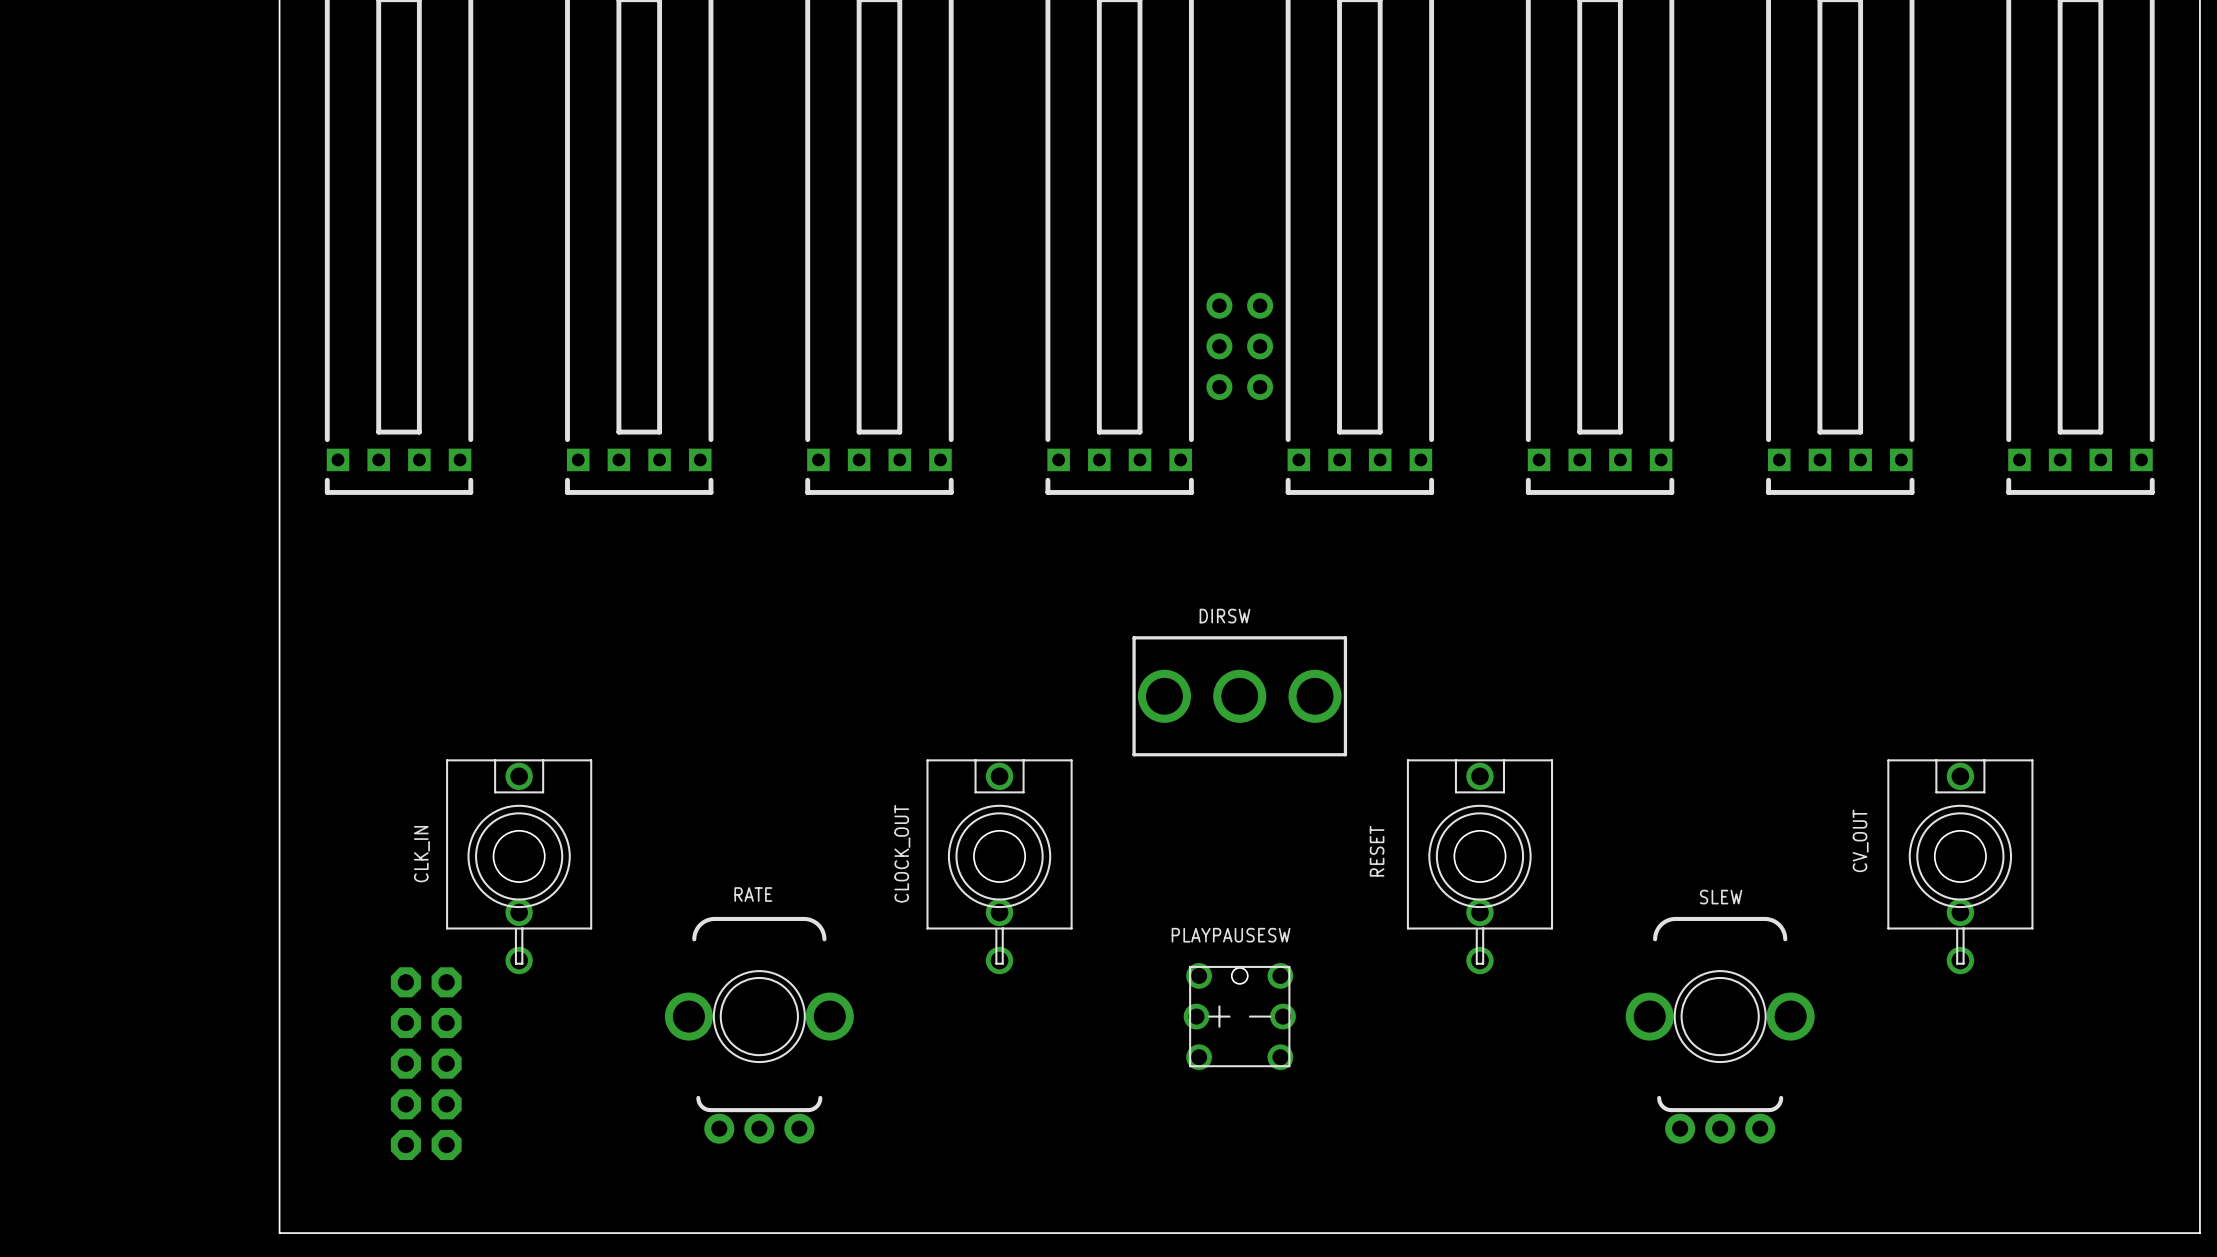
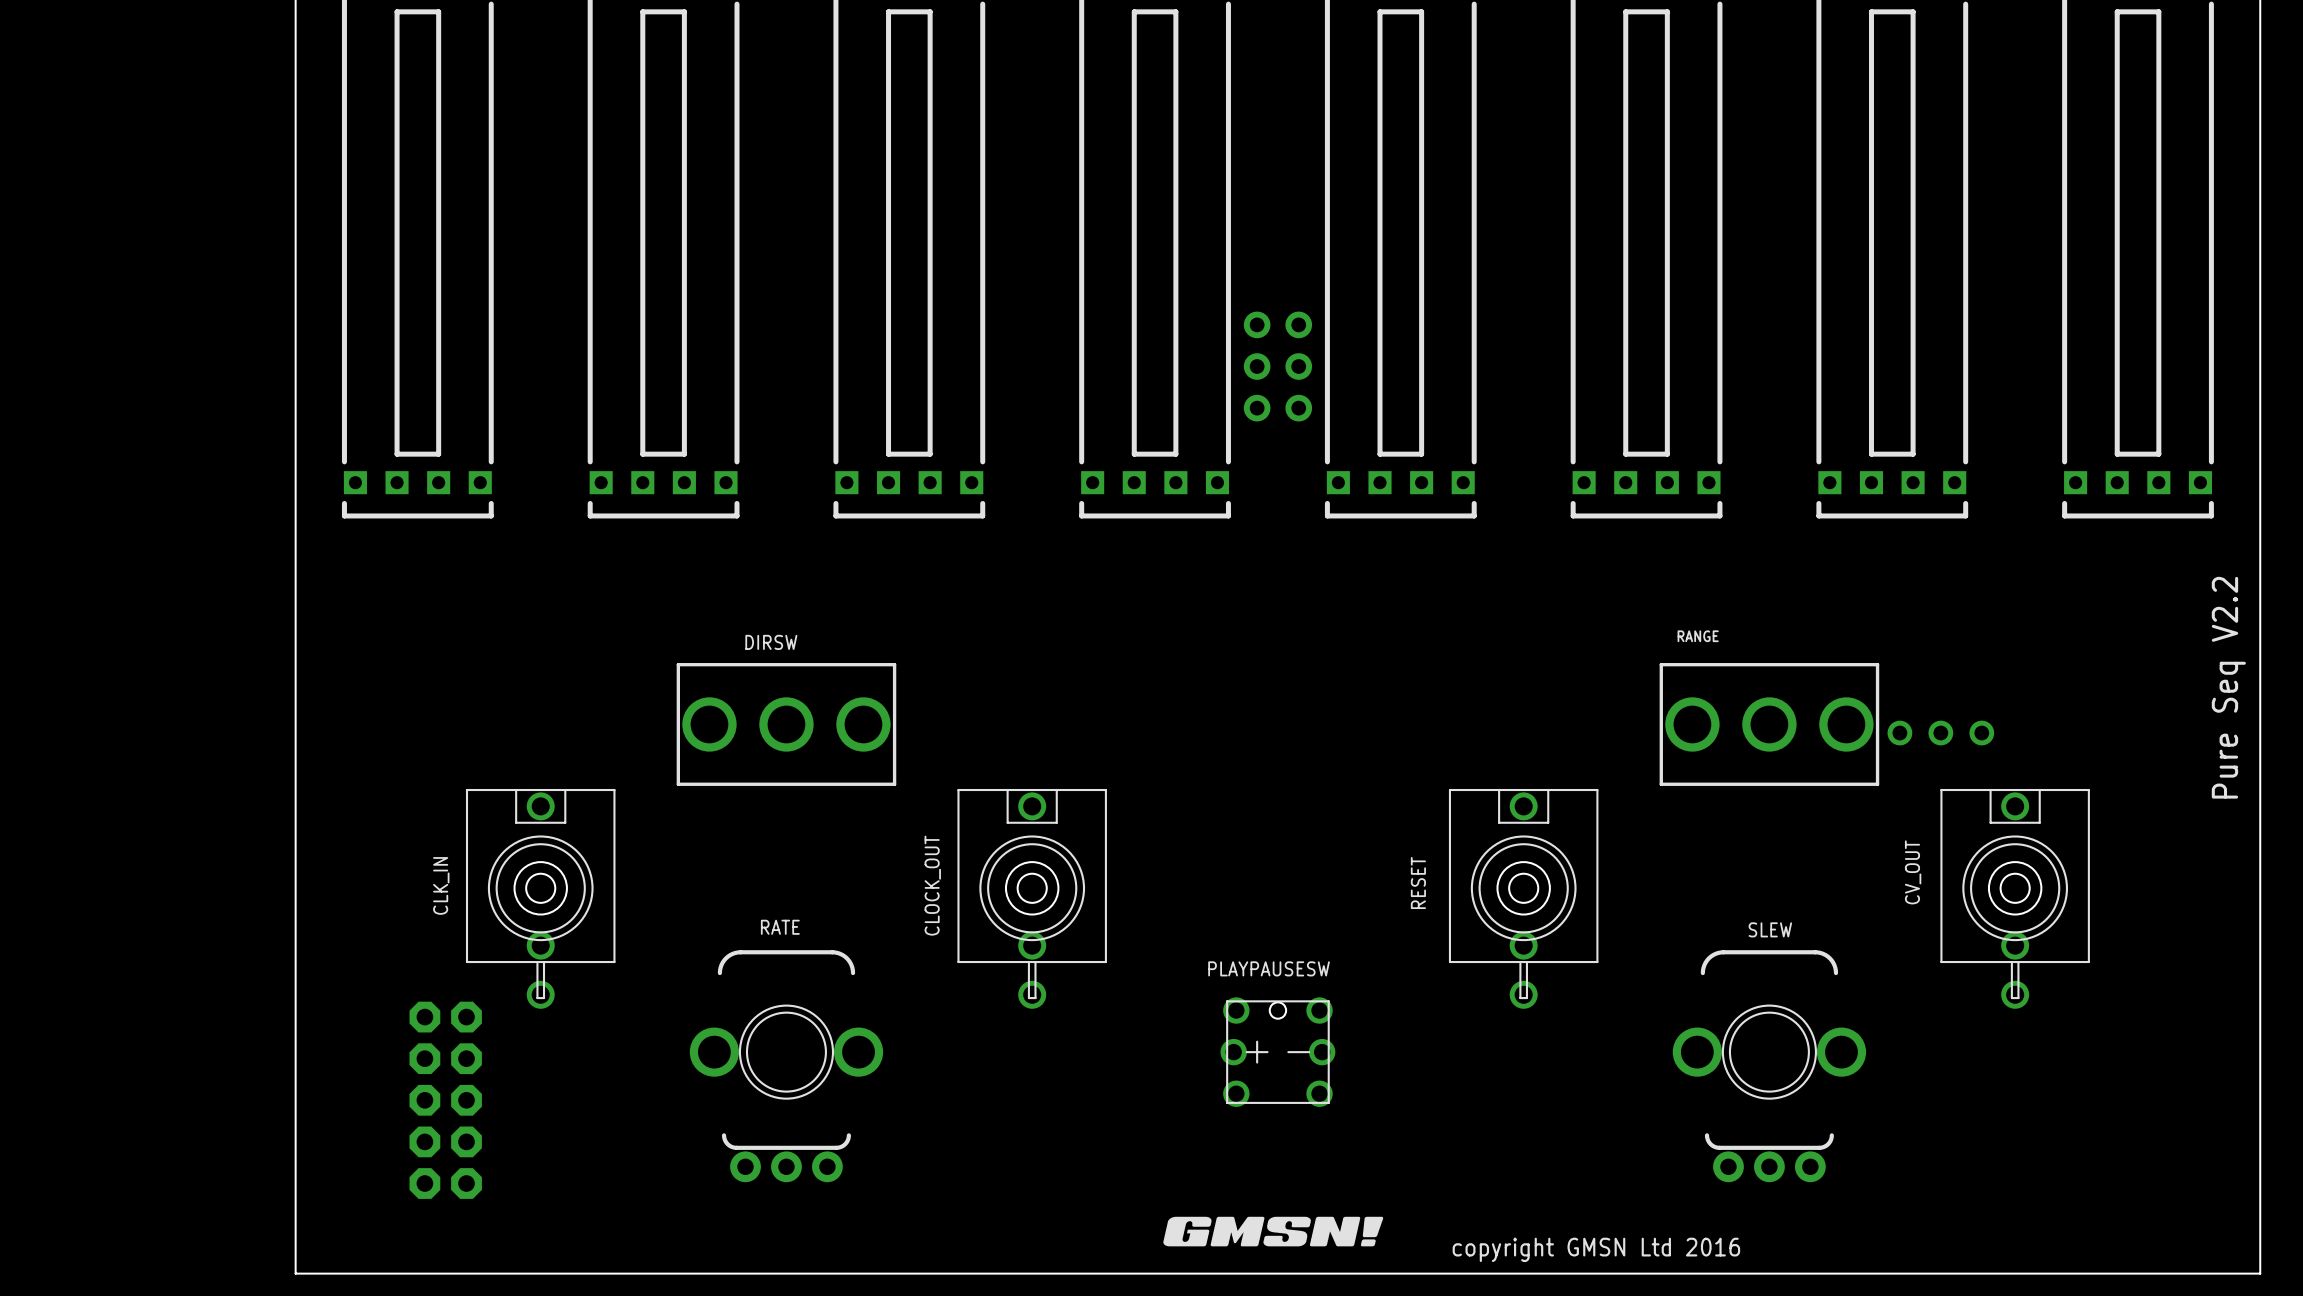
text: none -> Pure Seq V2.2 (2228, 687)
DIRSW: none -> (786, 724)
DIRSW: (1239, 696) -> none
RANGE: none -> (1769, 724)
part: none -> (1940, 733)
CLK_IN footprint: [446, 759, 593, 975] -> [465, 788, 616, 1009]
CLOCK_OUT footprint: [926, 759, 1073, 975] -> [957, 788, 1107, 1009]
RESET footprint: [1406, 759, 1554, 975] -> [1448, 788, 1599, 1009]
CV_OUT footprint: [1887, 759, 2034, 975] -> [1940, 788, 2090, 1009]
drawing: none -> [1163, 1216, 1384, 1247]
text: none -> copyright GMSN Ltd 2016 (1596, 1249)

